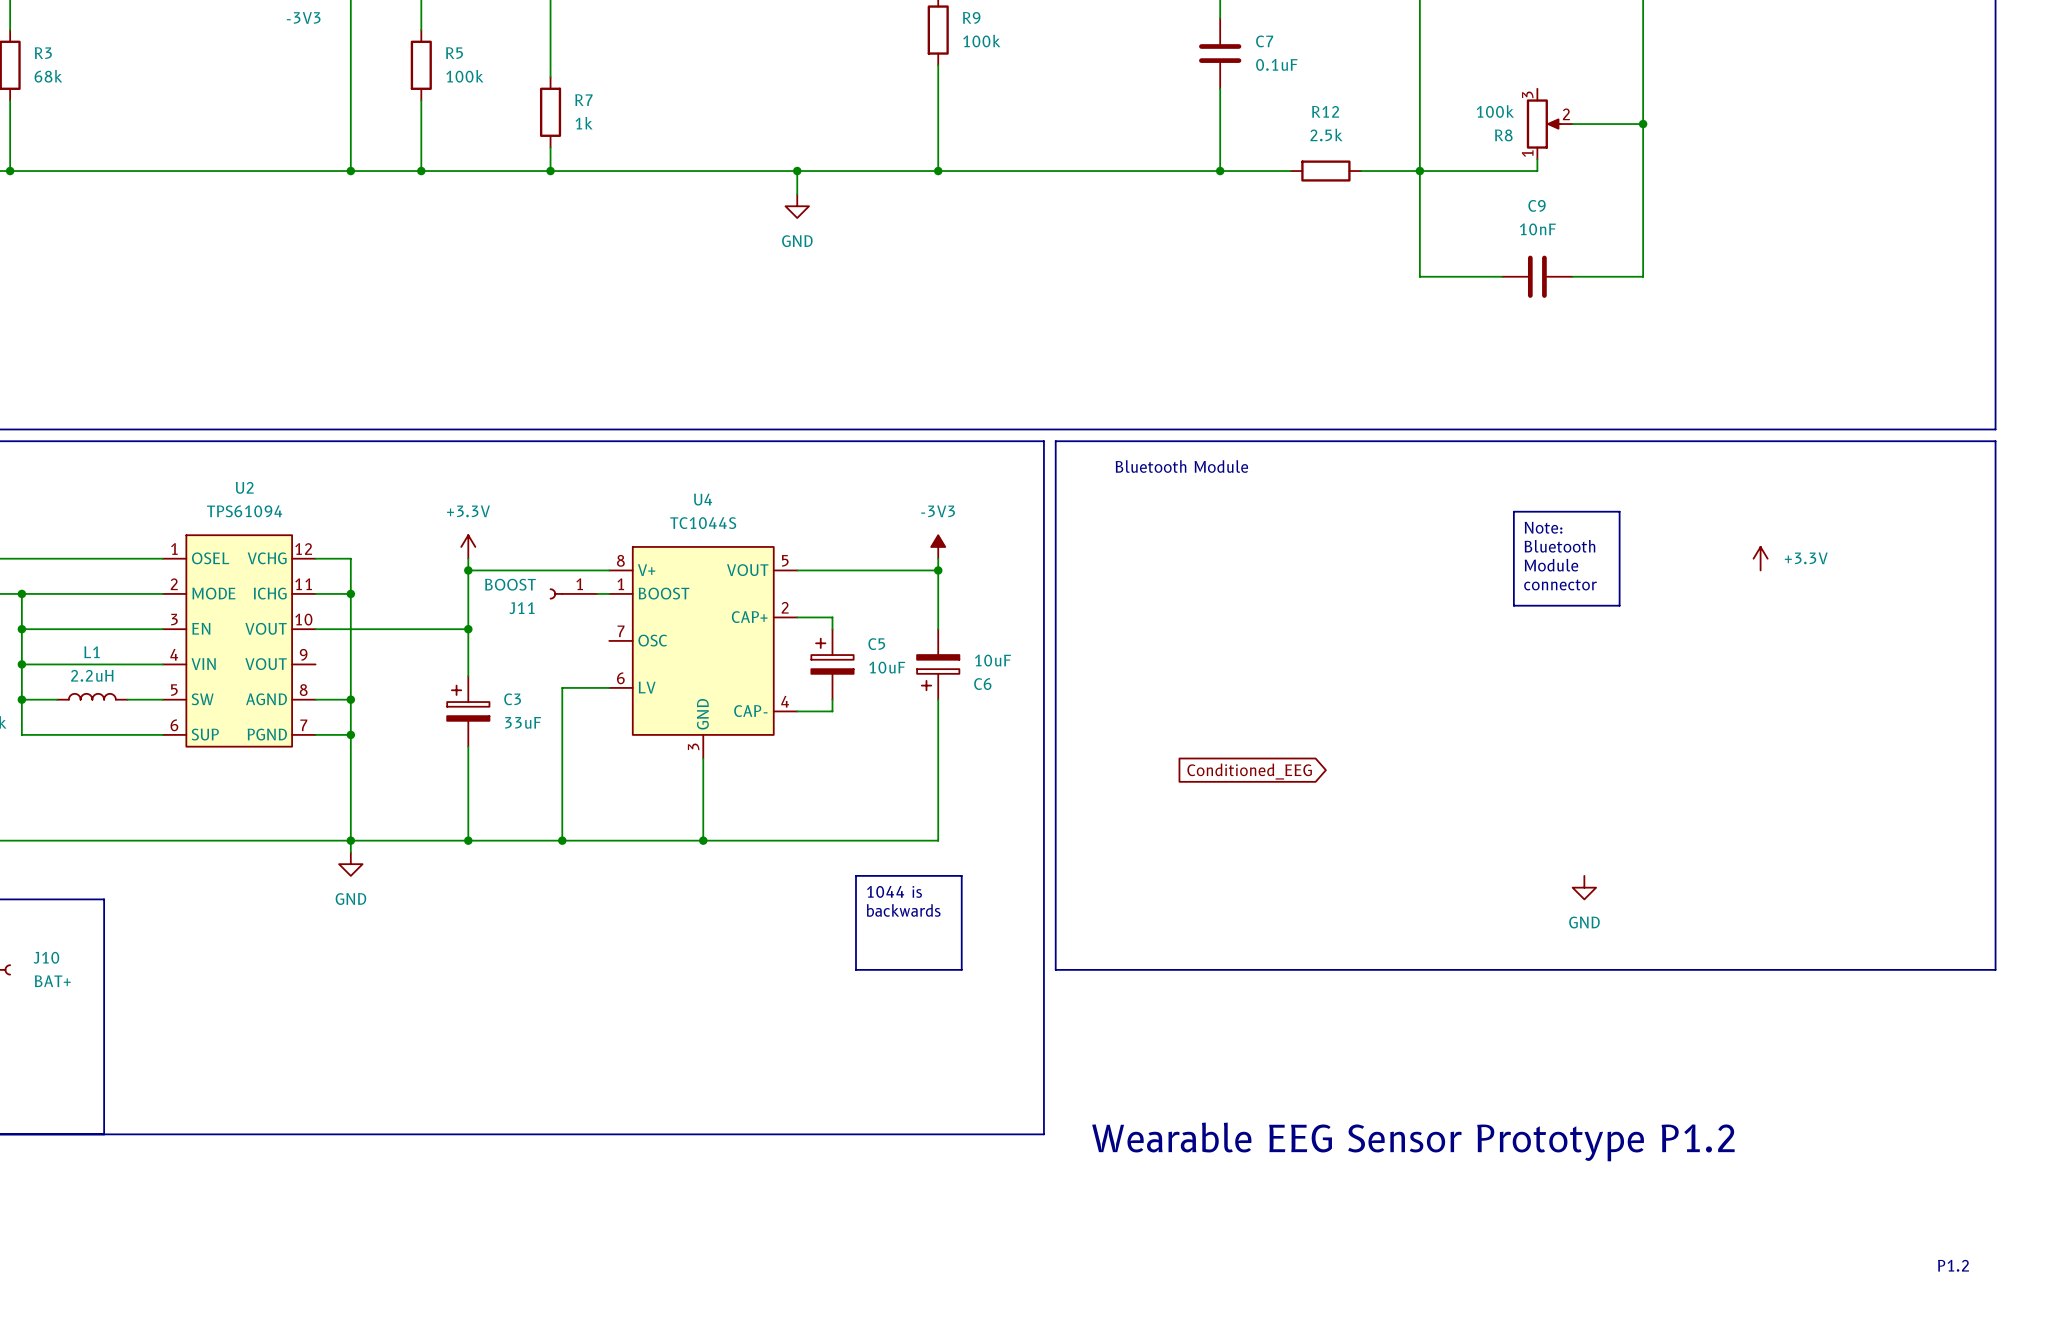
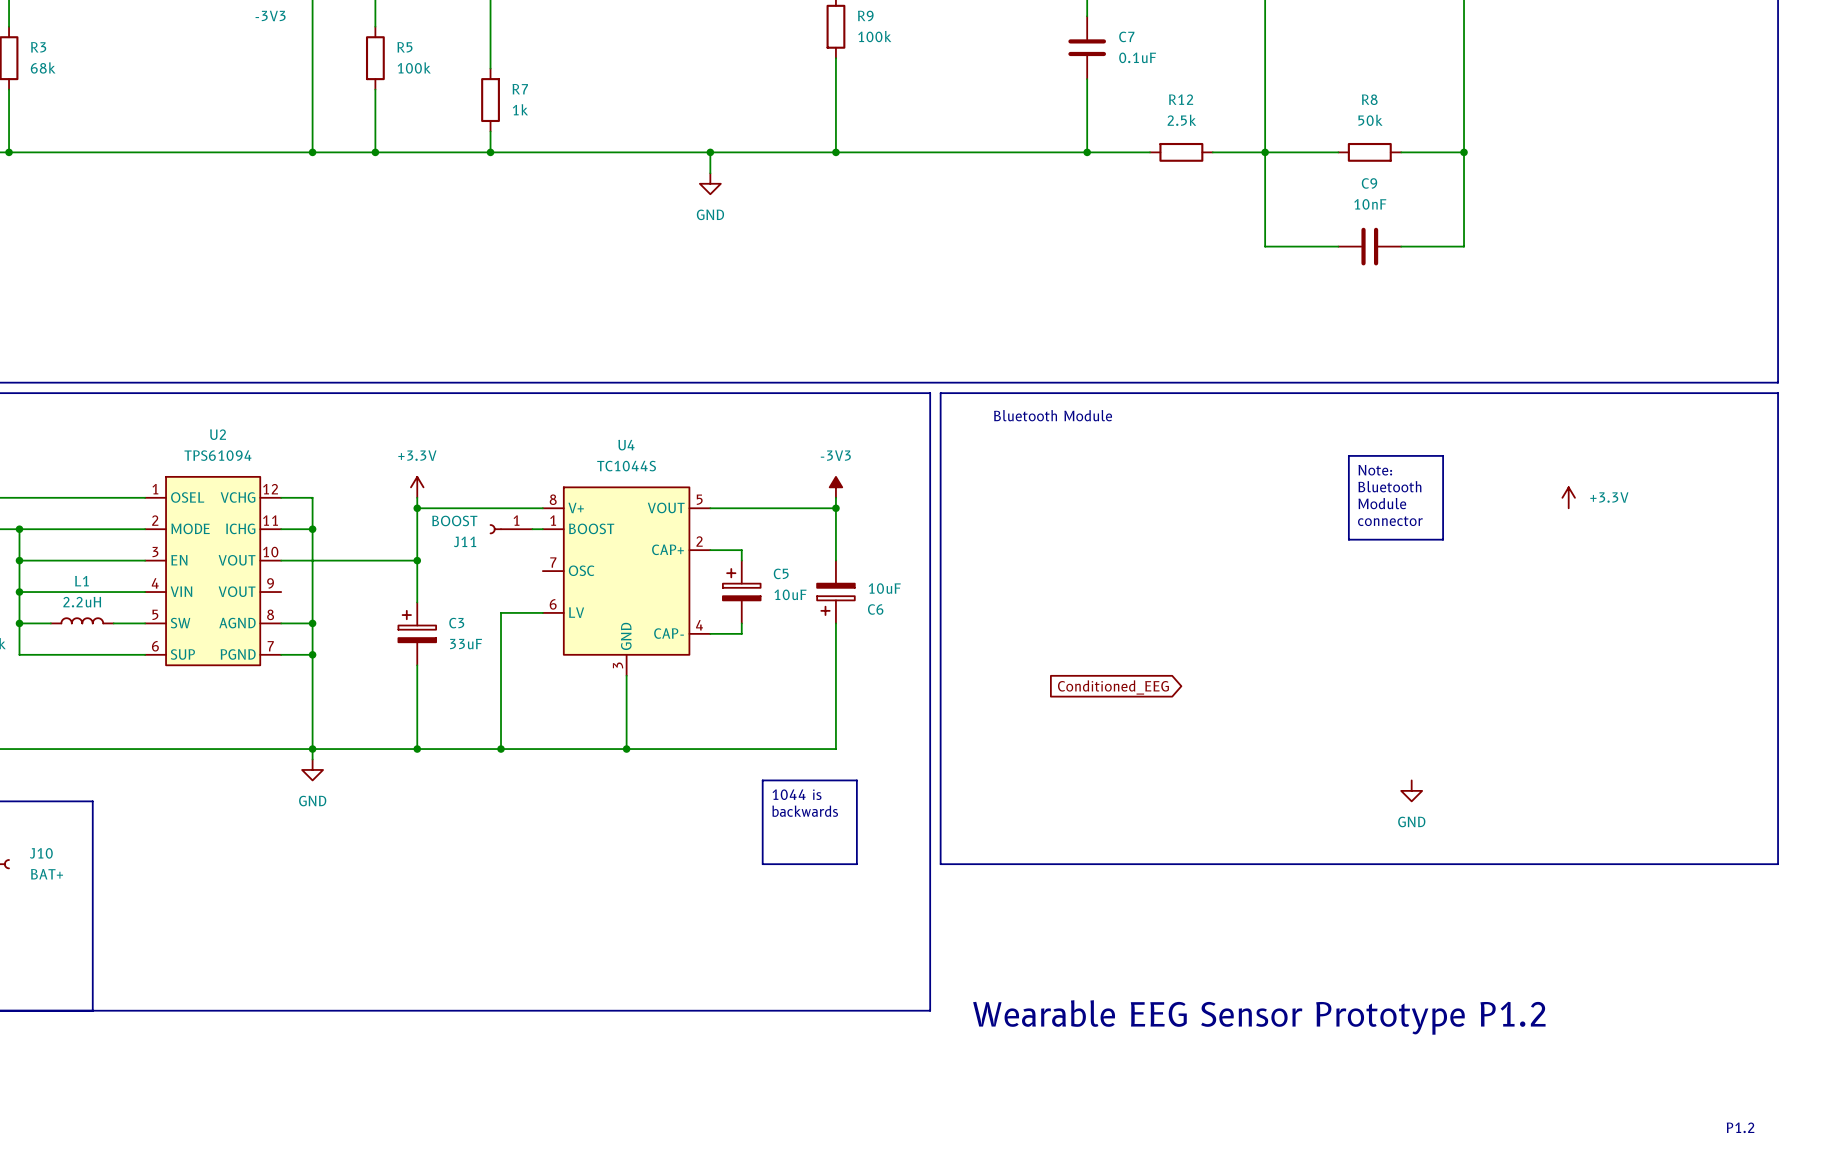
R8 symbol: [1526, 88, 1573, 160] -> [1338, 142, 1402, 162]
R8 value: 100k (1495, 111) -> 50k (1370, 120)
wire: (1572, 124) (1643, 124) -> (1401, 152) (1464, 152)
junction position: (1643, 124) -> (1464, 152)
R8 name position: R8 (1503, 135) -> R8 (1369, 99)
wire: (1537, 159) (1537, 171) (1502, 171) -> none

